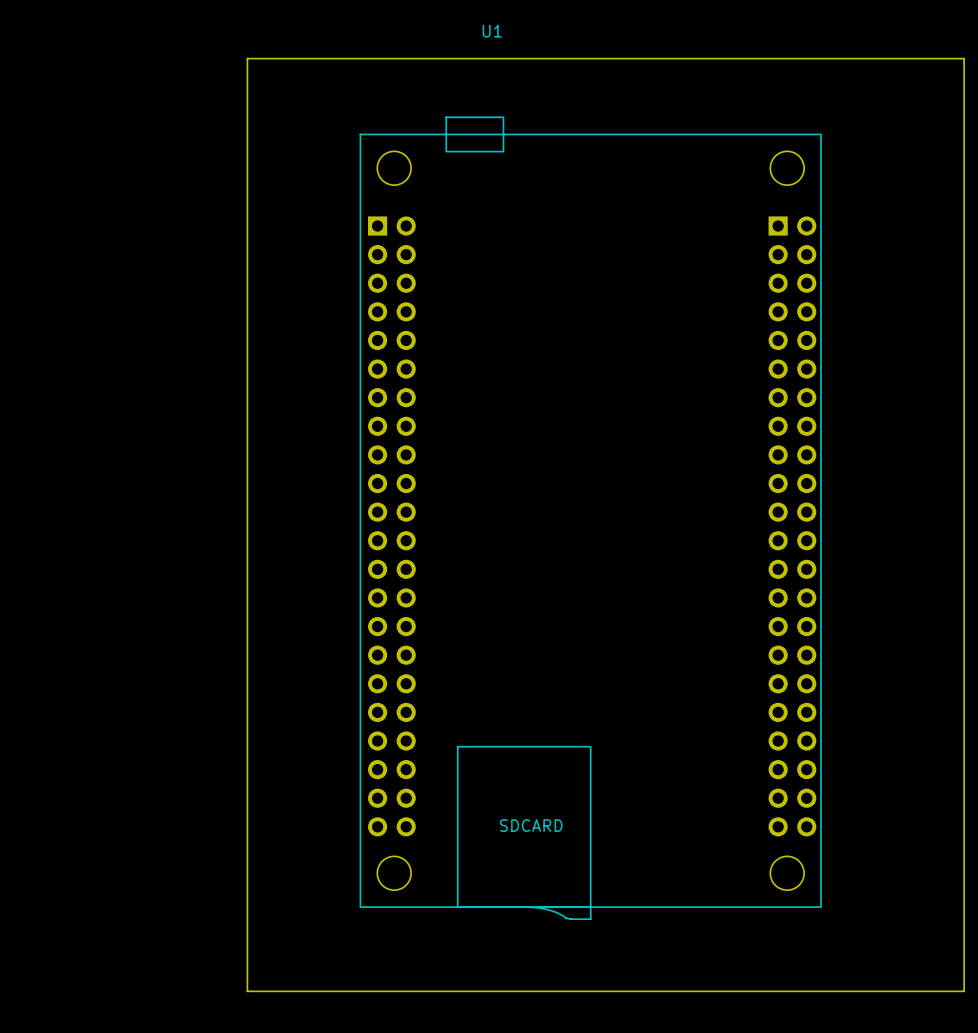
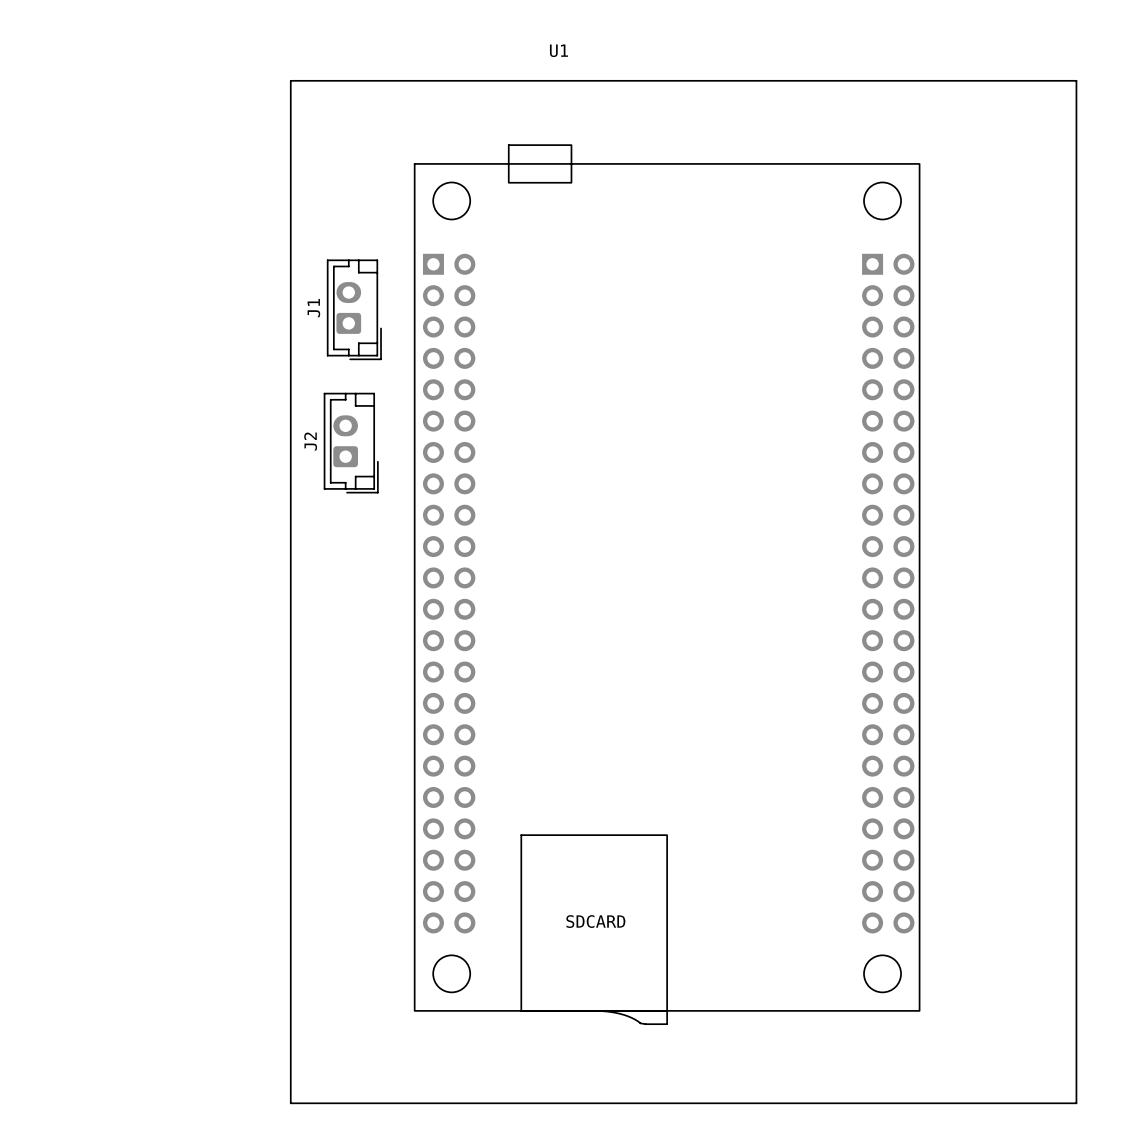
J1: none -> (354, 309)
J2: none -> (351, 443)

